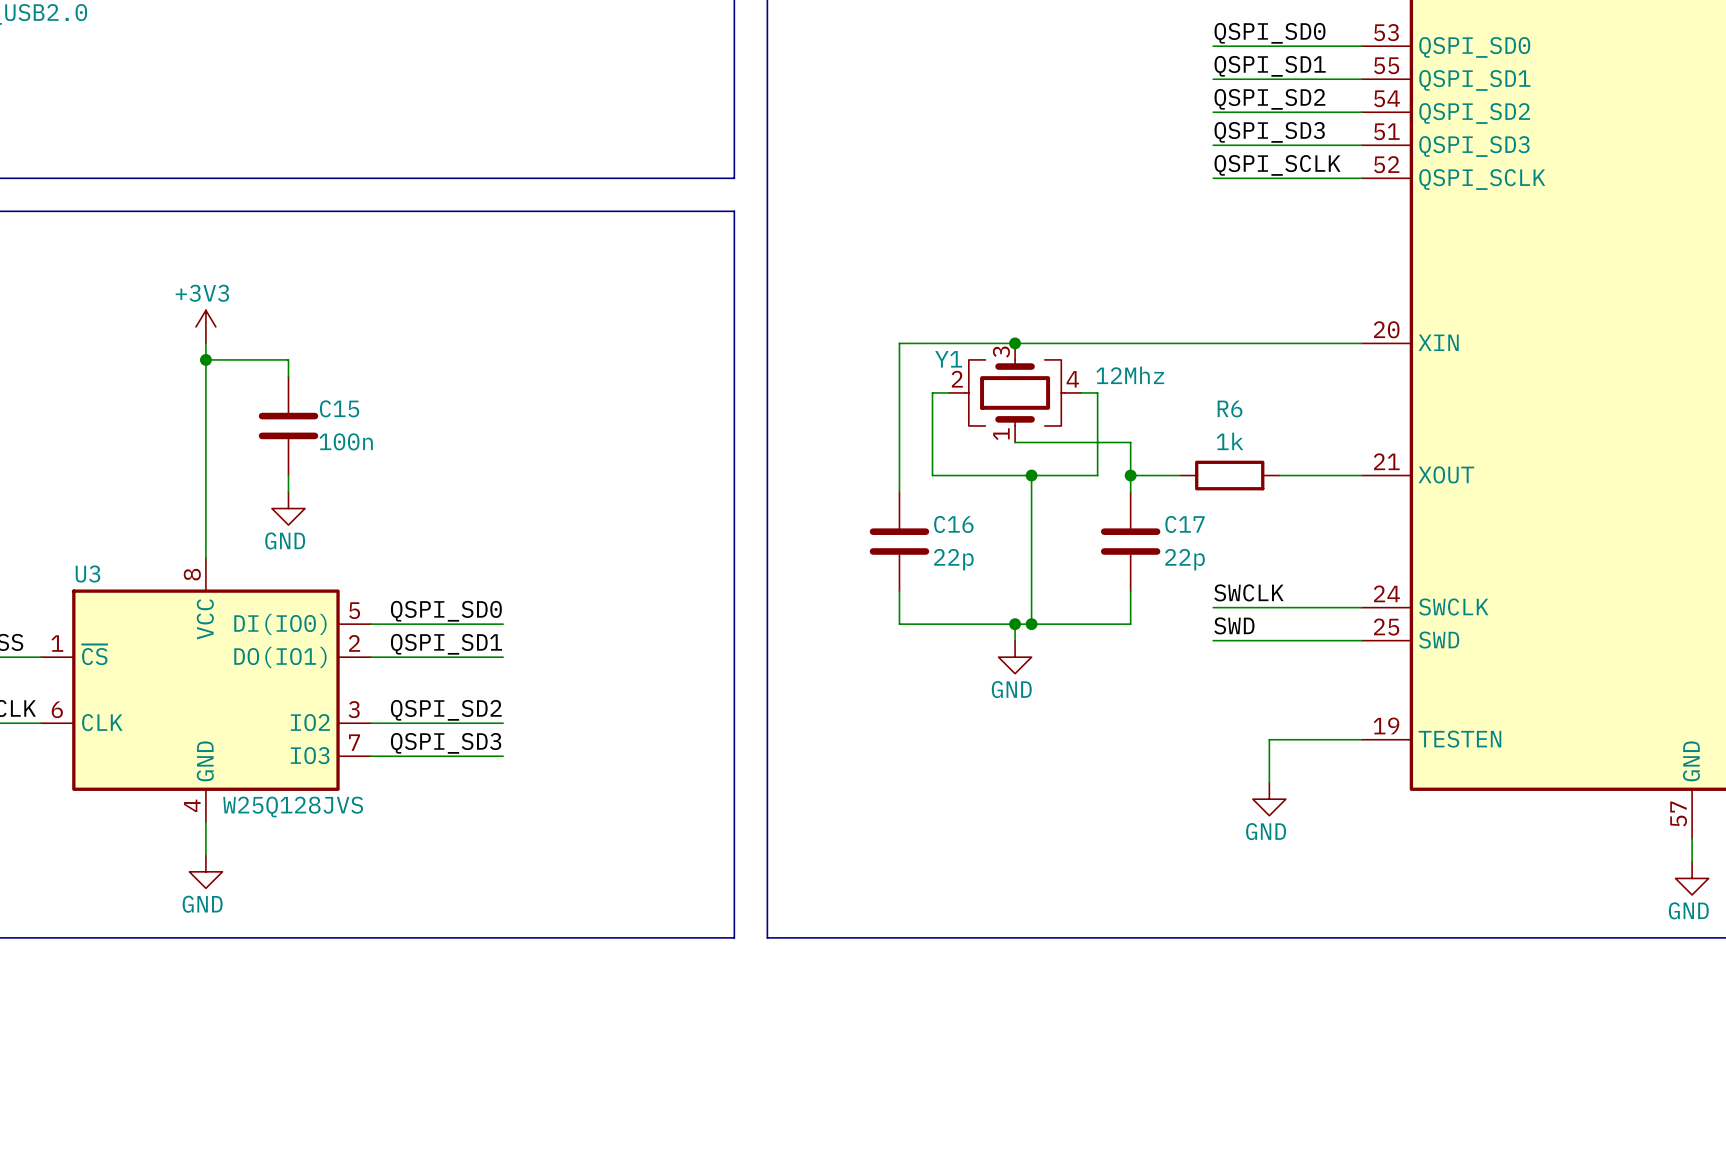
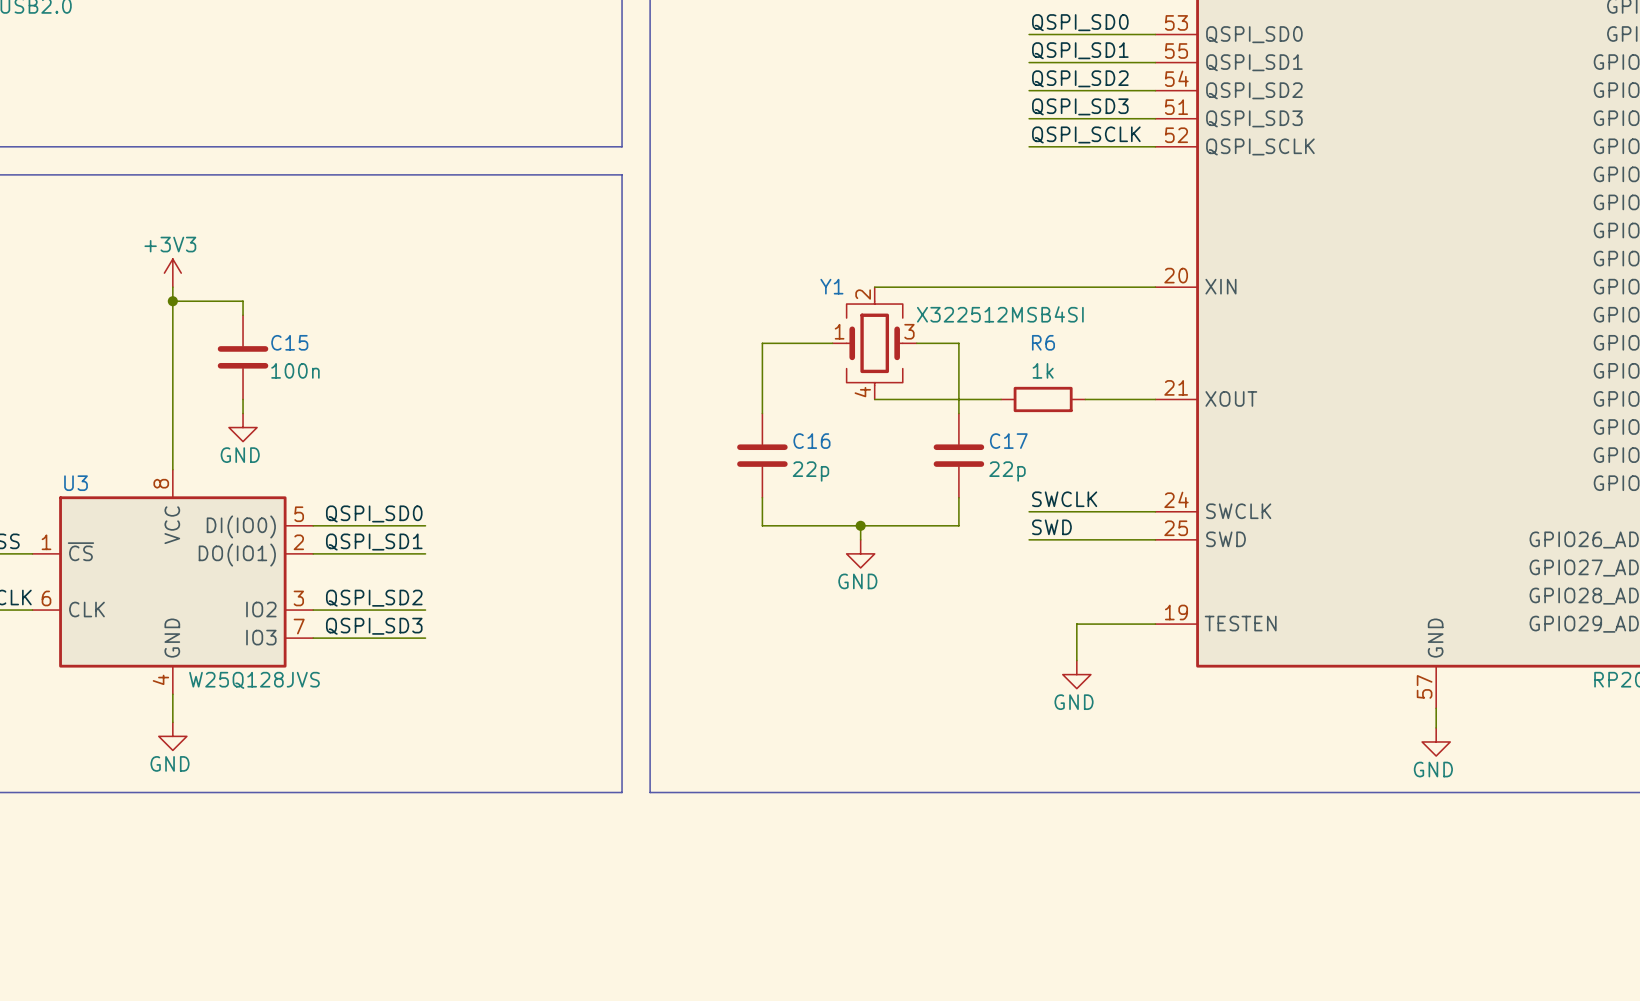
junction: (1015, 343) -> none
wire: (1031, 343) (899, 343) (899, 409) -> (832, 343) (762, 343)
Y1 name position: Y1 (948, 359) -> Y1 (831, 286)
Y1 value: 12Mhz (1130, 375) -> X322512MSB4SI (1000, 314)
wire: (949, 392) (932, 392) (932, 475) (1031, 475) (1031, 624) -> none
Y1 rotation: 0° (1015, 392) -> 90° clockwise (874, 343)
wire: (1081, 392) (1097, 392) (1097, 475) -> (958, 399) (930, 399)
wire: (1015, 442) (1130, 442) -> (916, 343) (958, 343) (958, 371)
junction: (1031, 475) -> none
junction: (1130, 475) -> none
junction: (1031, 624) -> none

